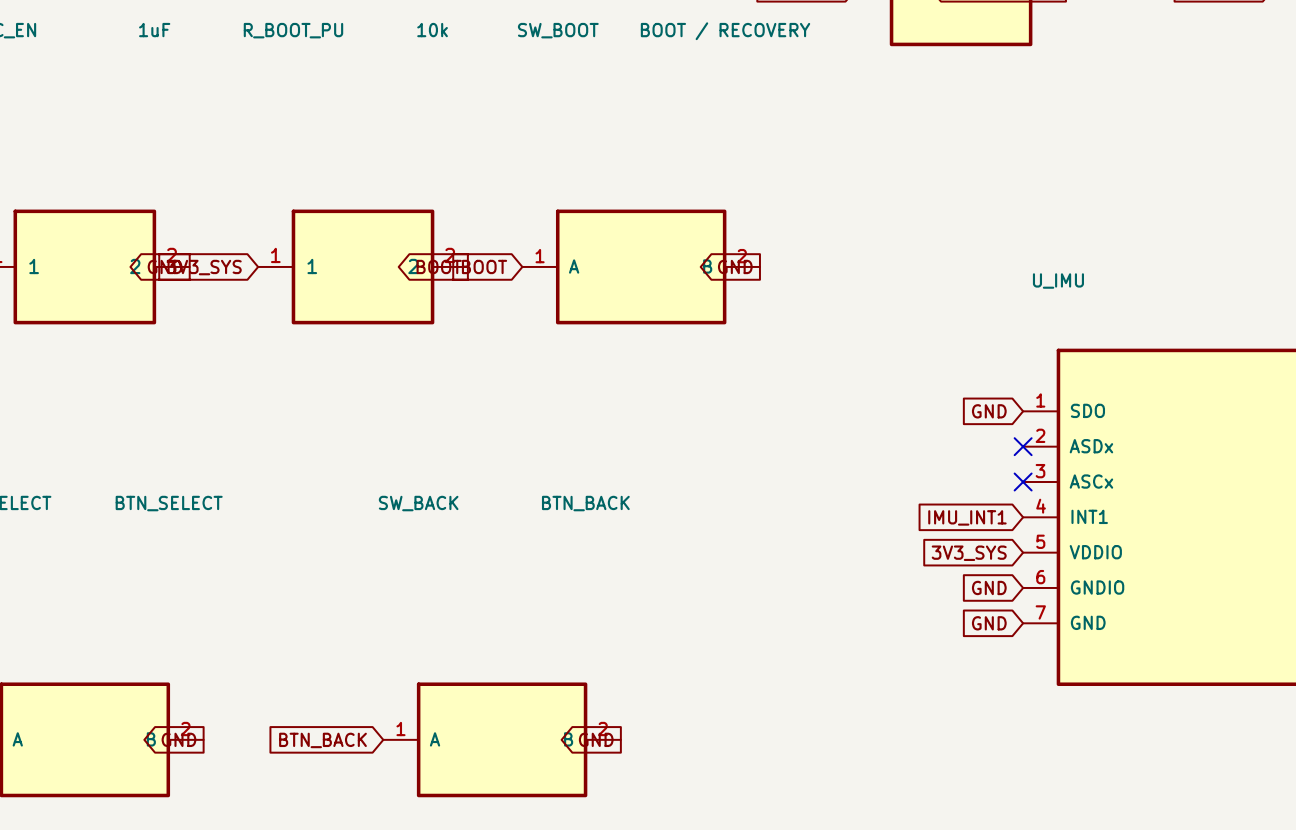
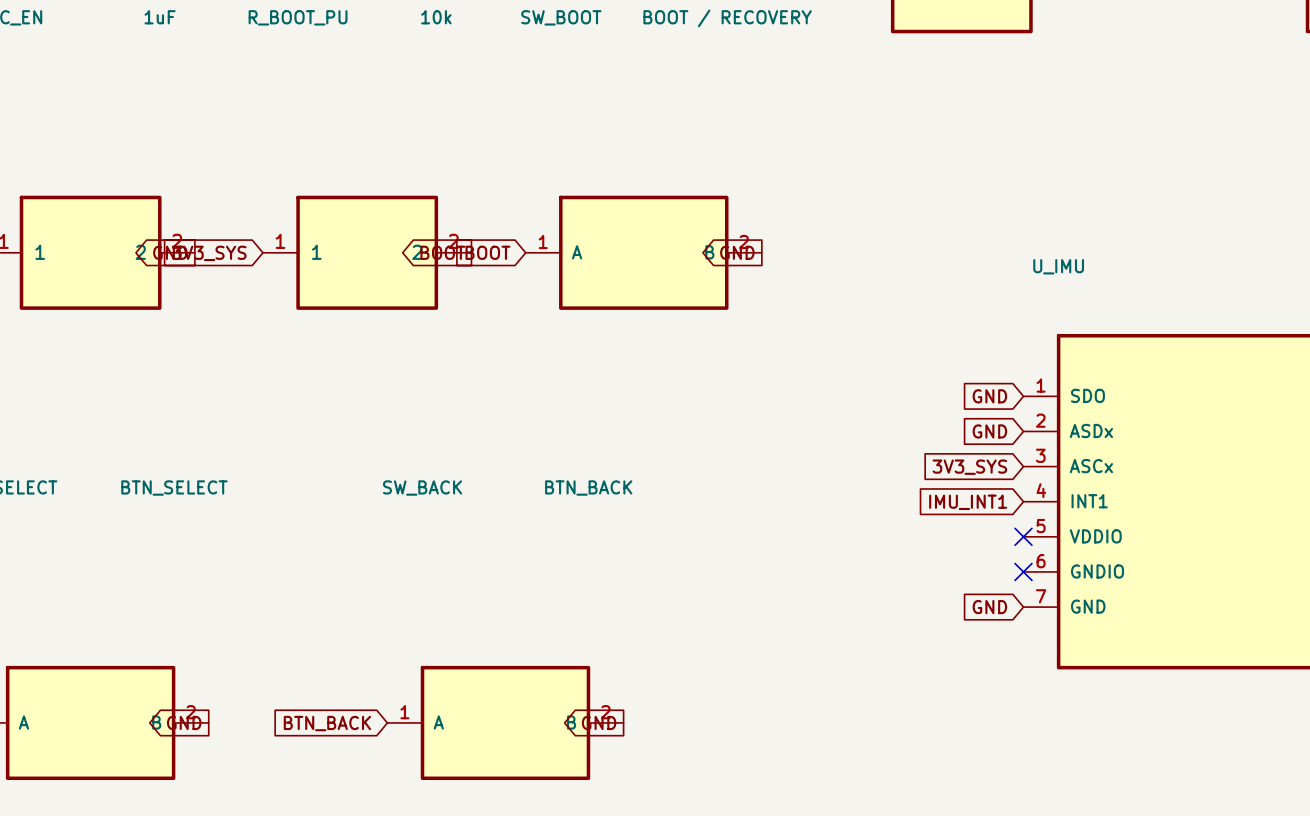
no-connect mark: (1023, 446) -> none
no-connect mark: (1023, 481) -> none
no-connect mark: none -> (1023, 536)
global label position: 3V3_SYS (969, 553) -> 3V3_SYS (969, 467)
global label position: GND (989, 587) -> GND (989, 431)
no-connect mark: none -> (1023, 571)

